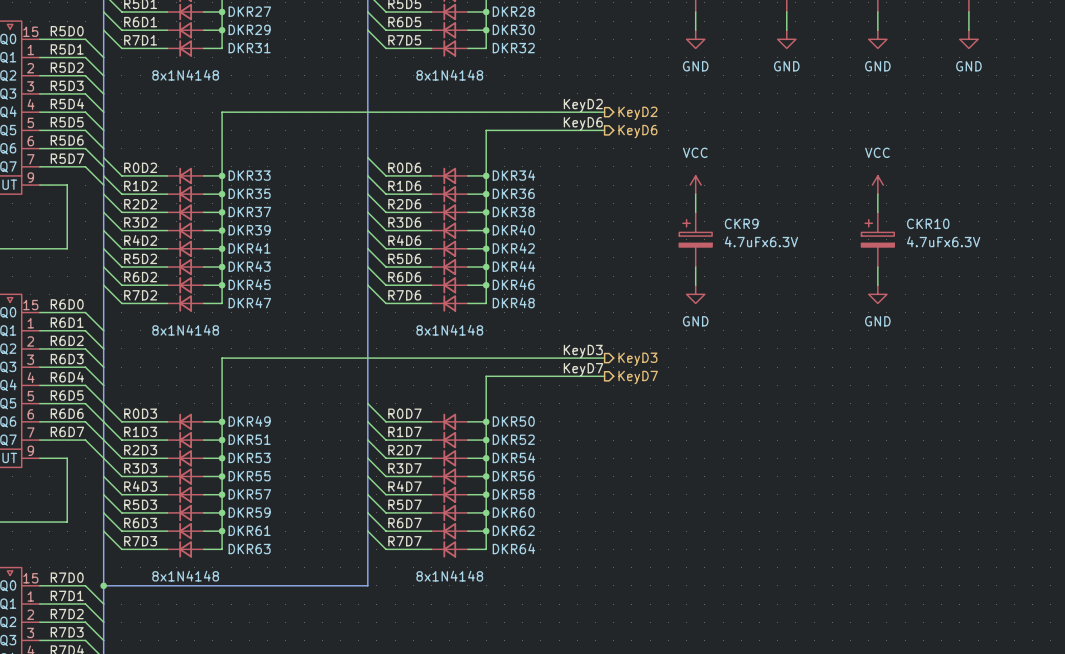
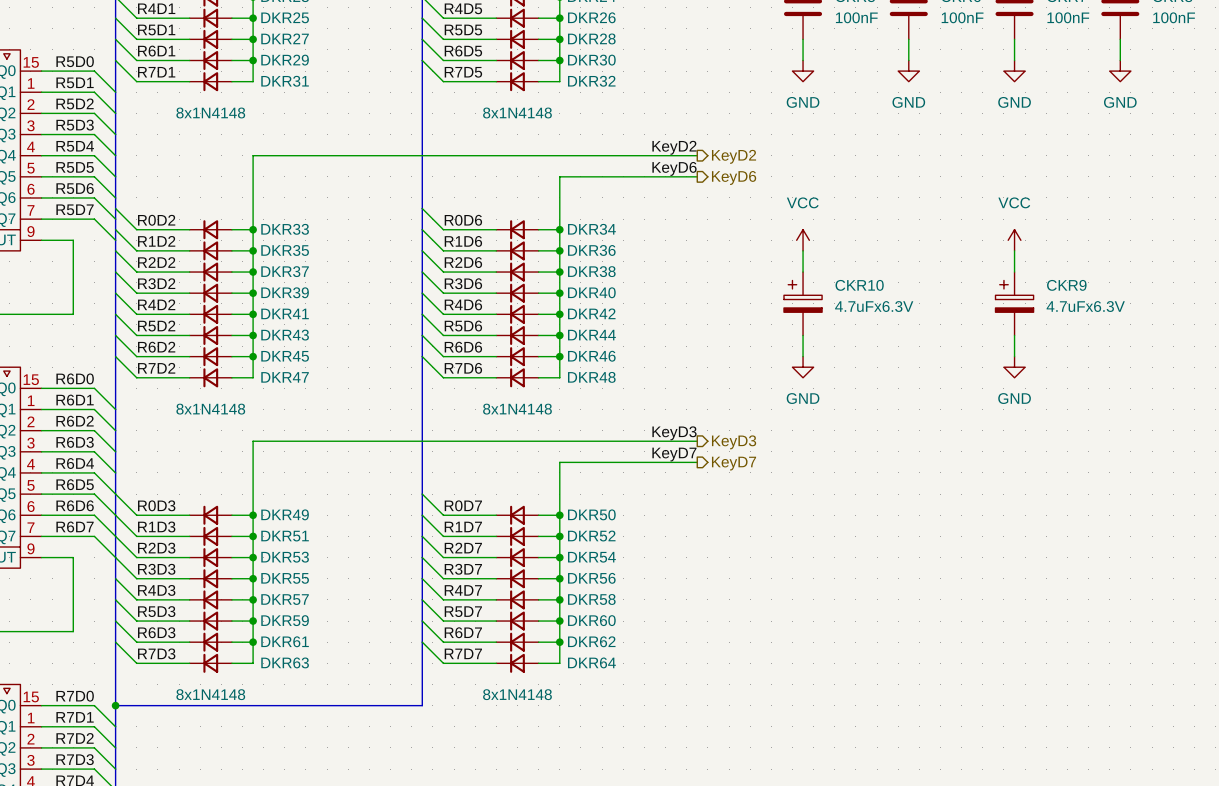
CKR9 name: CKR9 (741, 223) -> CKR10 (859, 285)
CKR10 name: CKR10 (928, 223) -> CKR9 (1066, 285)

